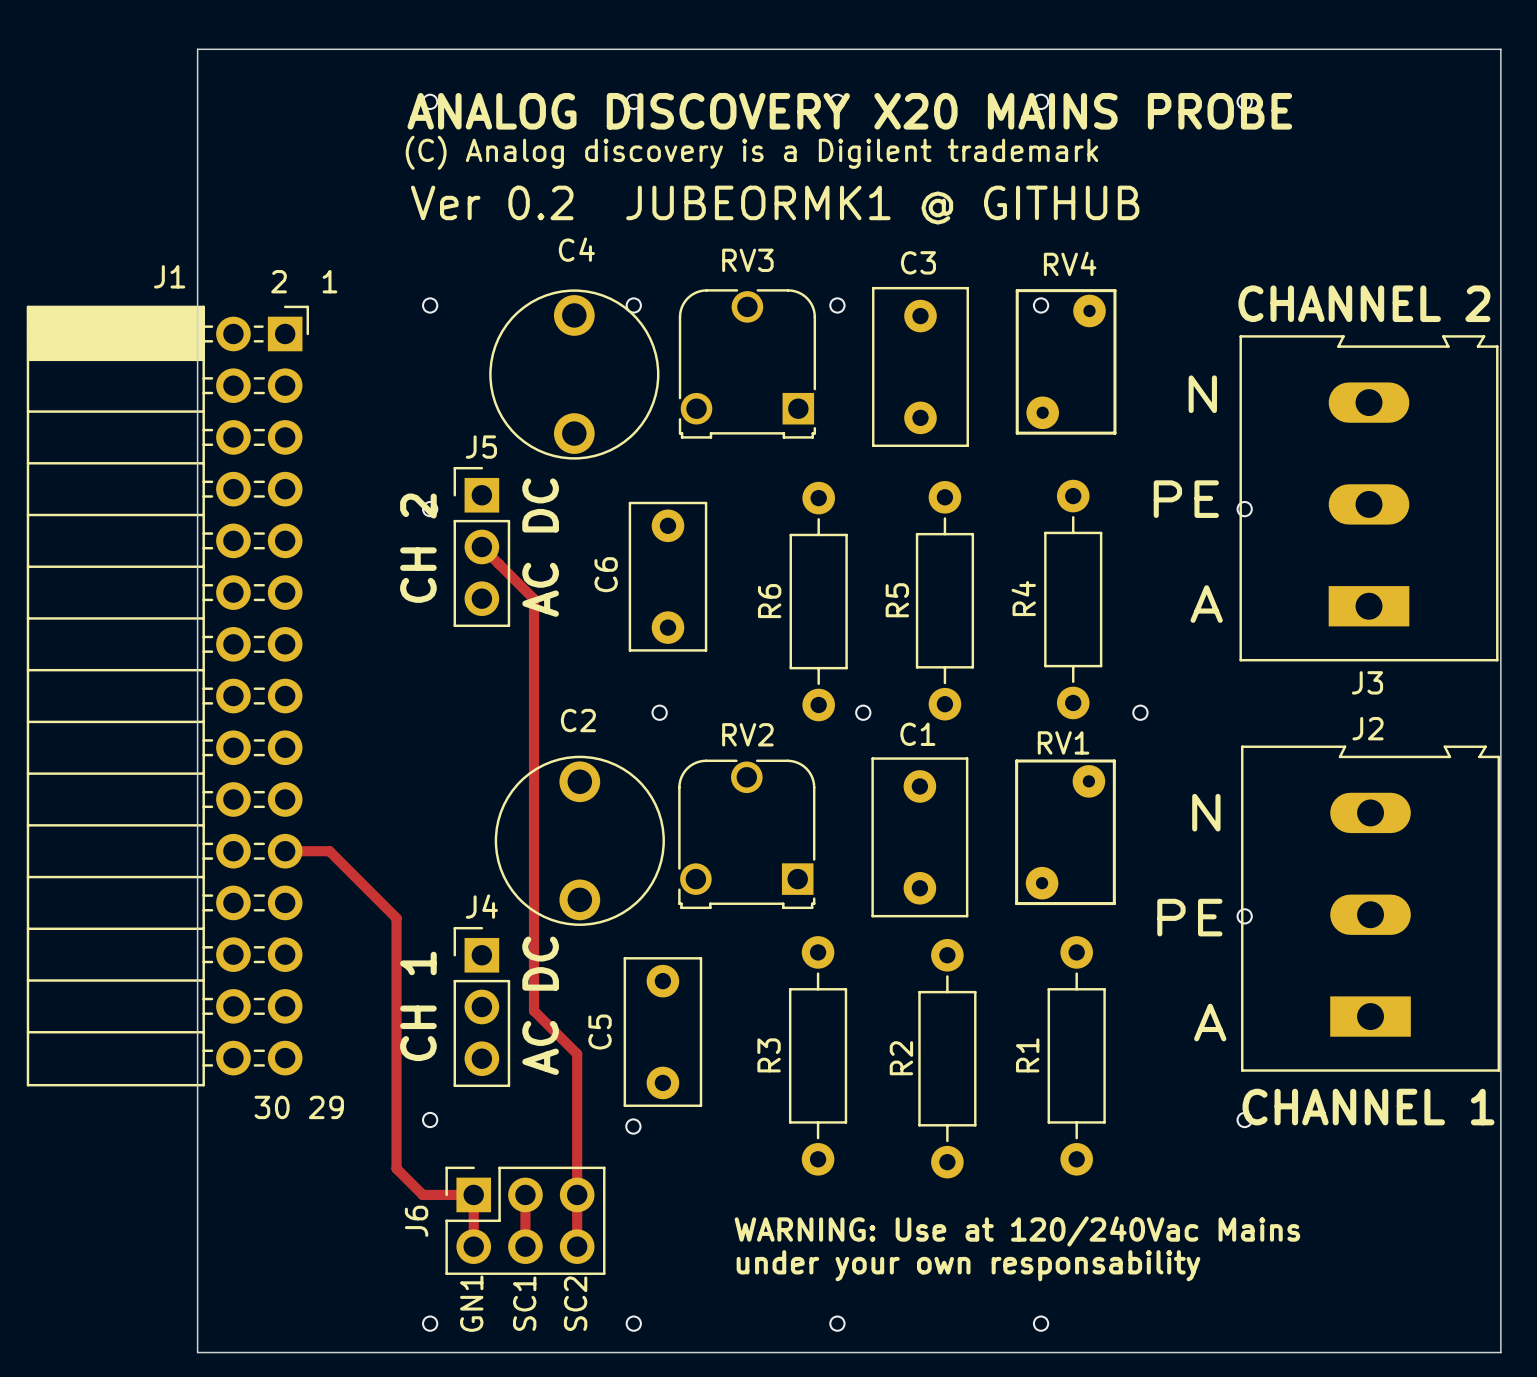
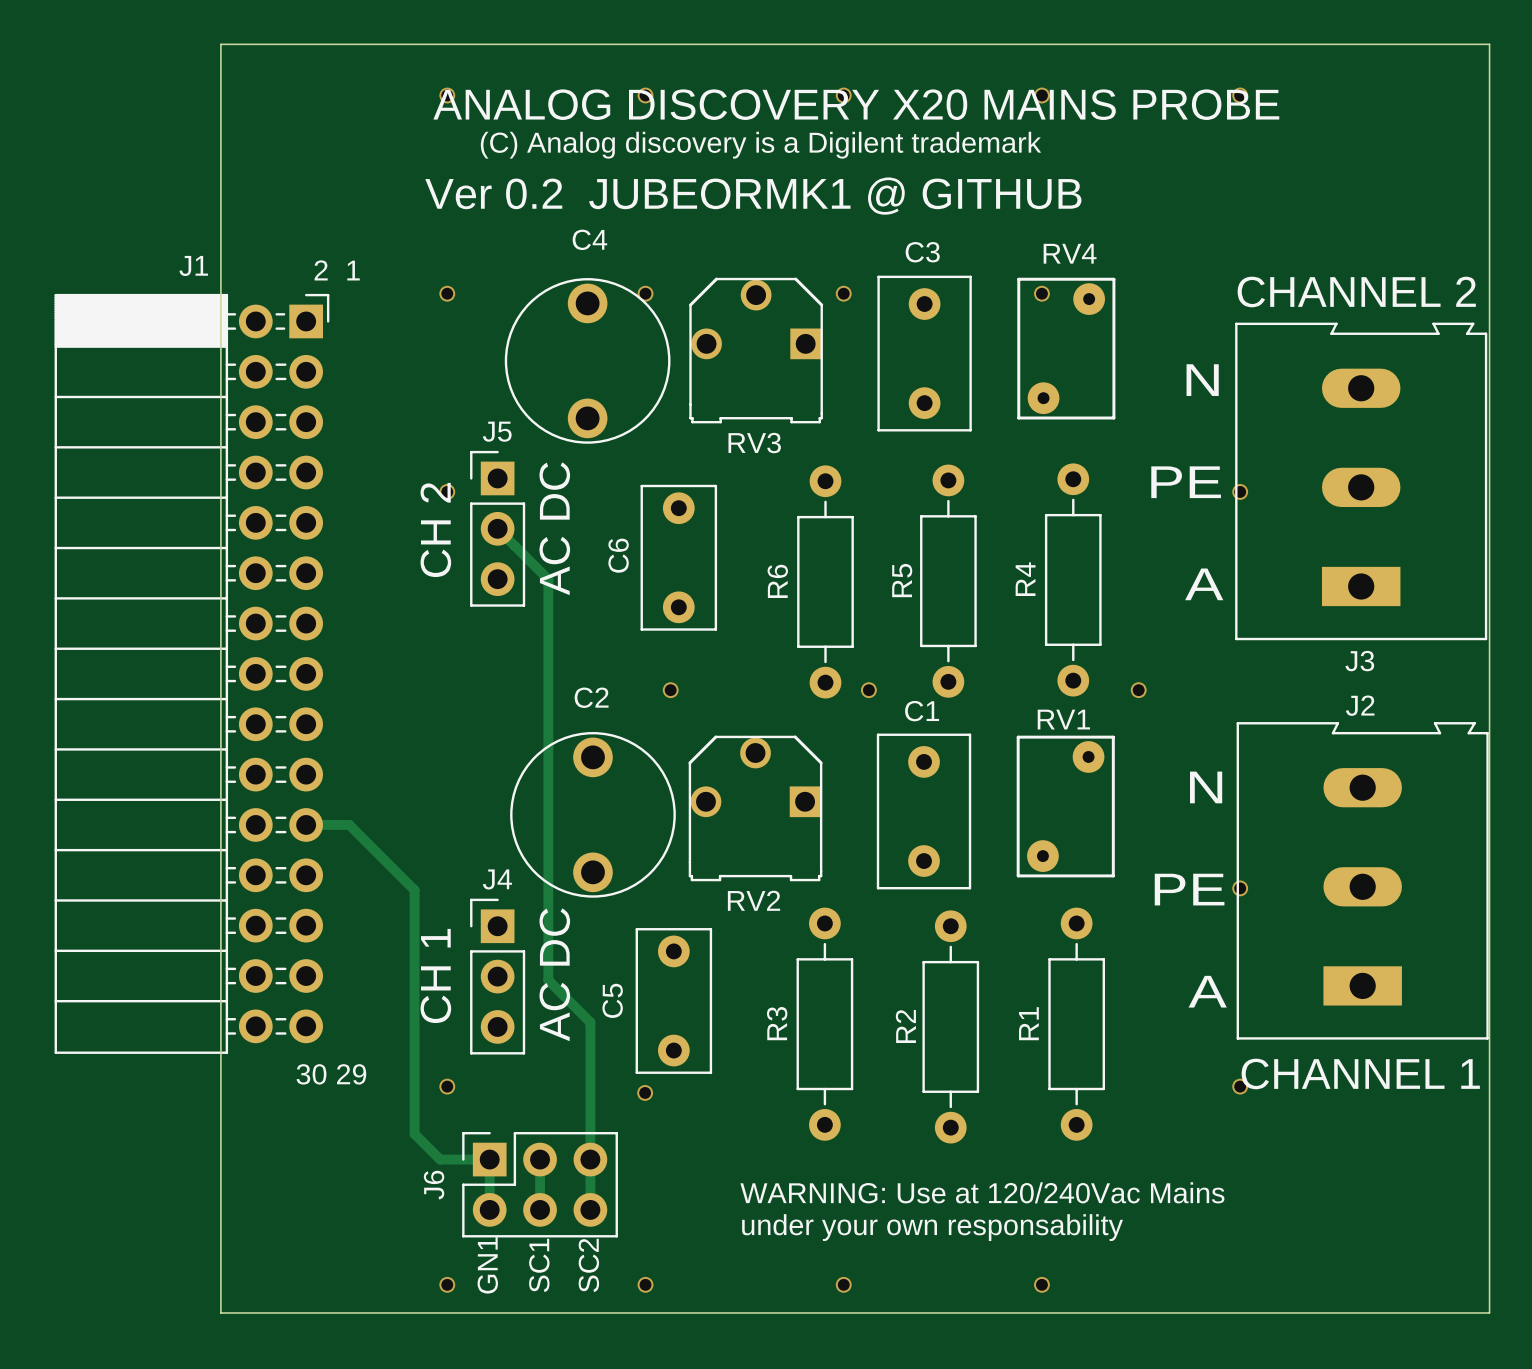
RV3 name position: RV3 (747, 260) -> RV3 (754, 443)
RV3 footprint: [678, 289, 817, 439] -> [689, 277, 824, 424]
RV2 name position: RV2 (747, 734) -> RV2 (754, 900)
RV2 footprint: [678, 759, 816, 910] -> [688, 735, 823, 882]

